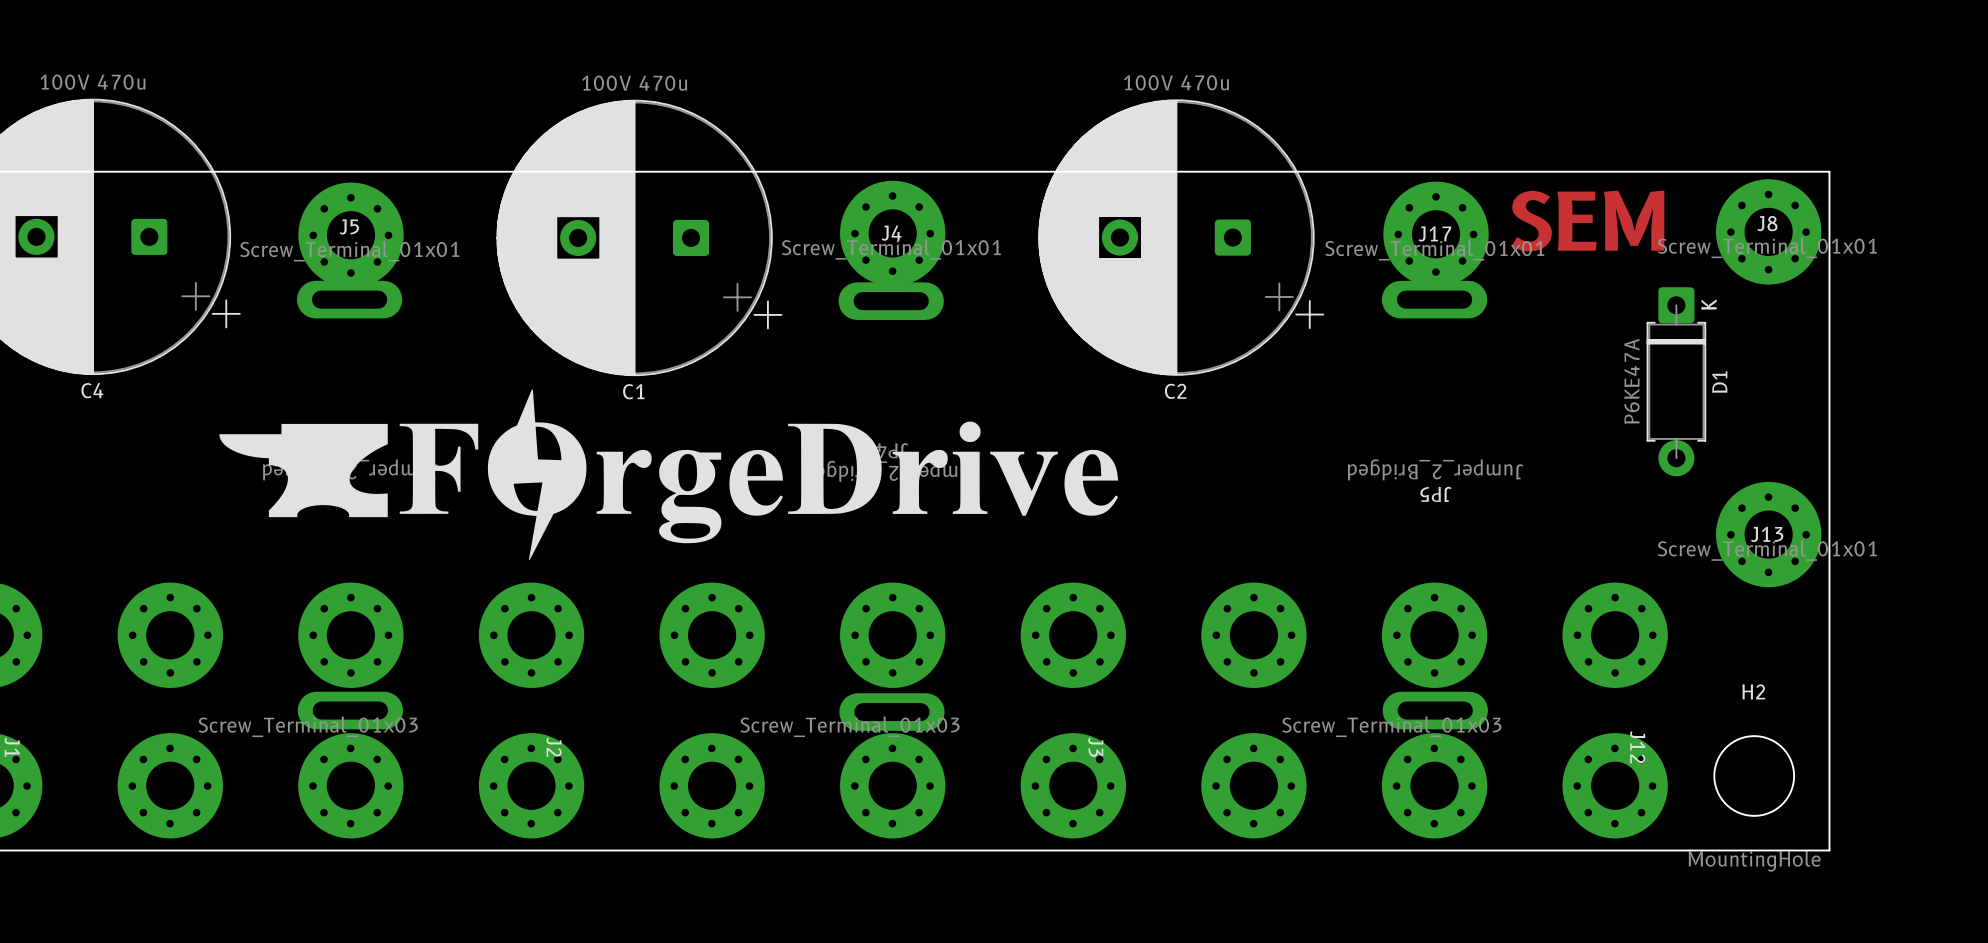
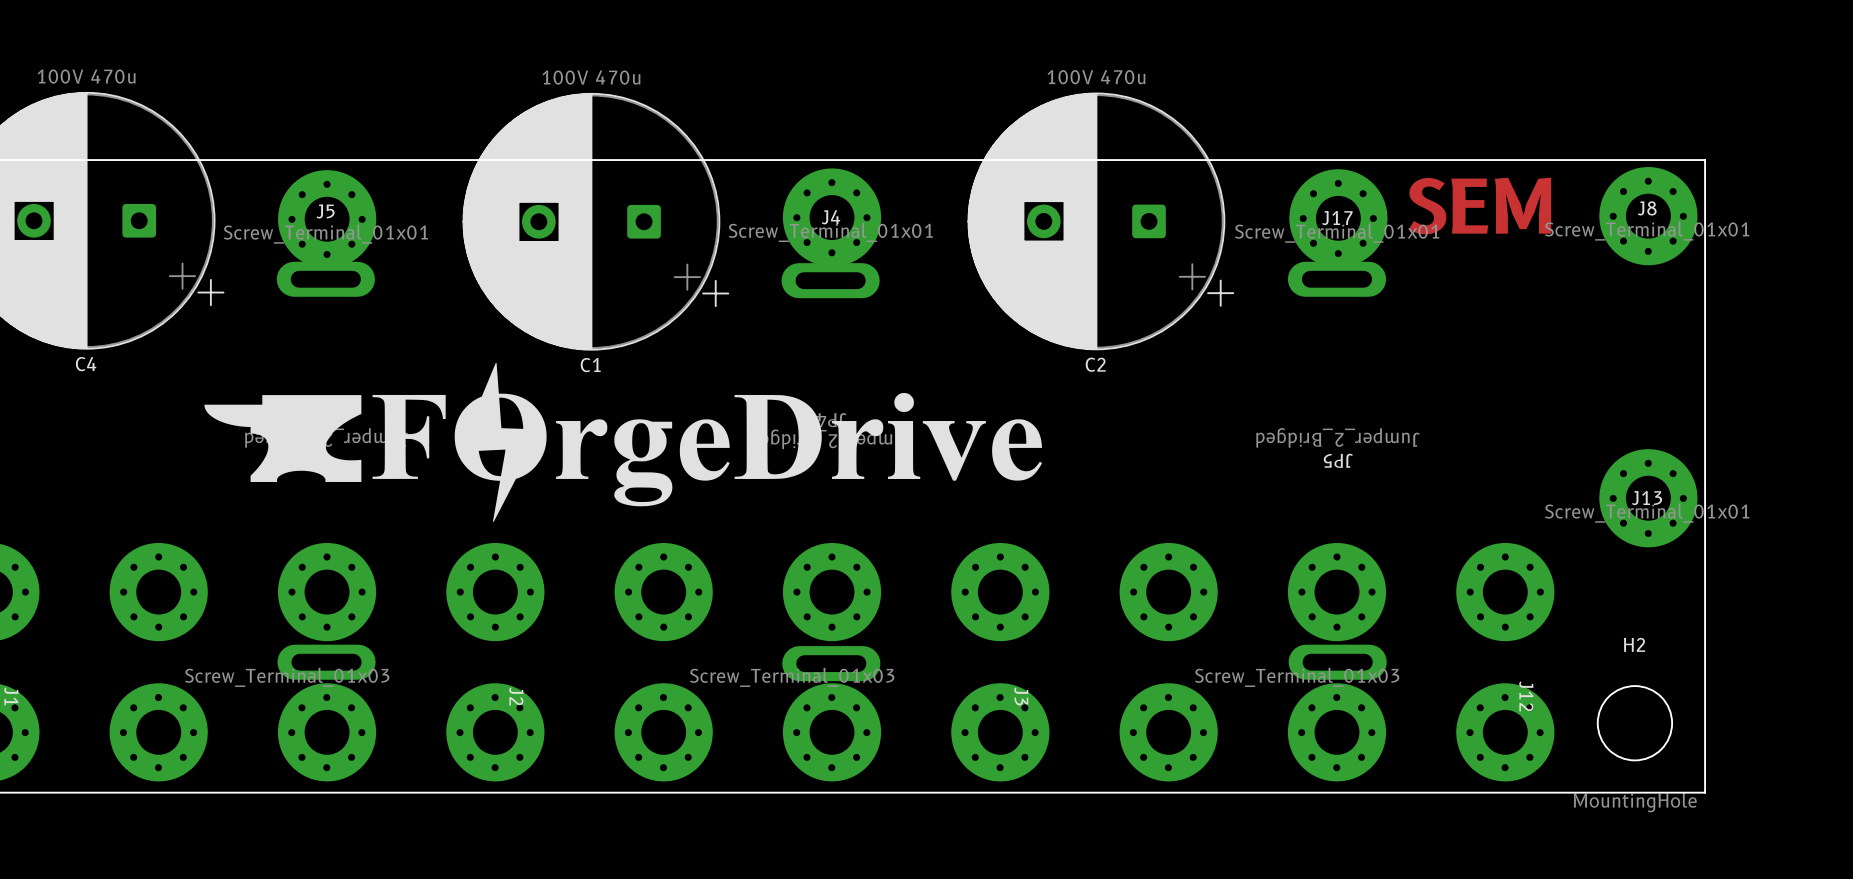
D1: P6KE47A (1676, 381) -> none

